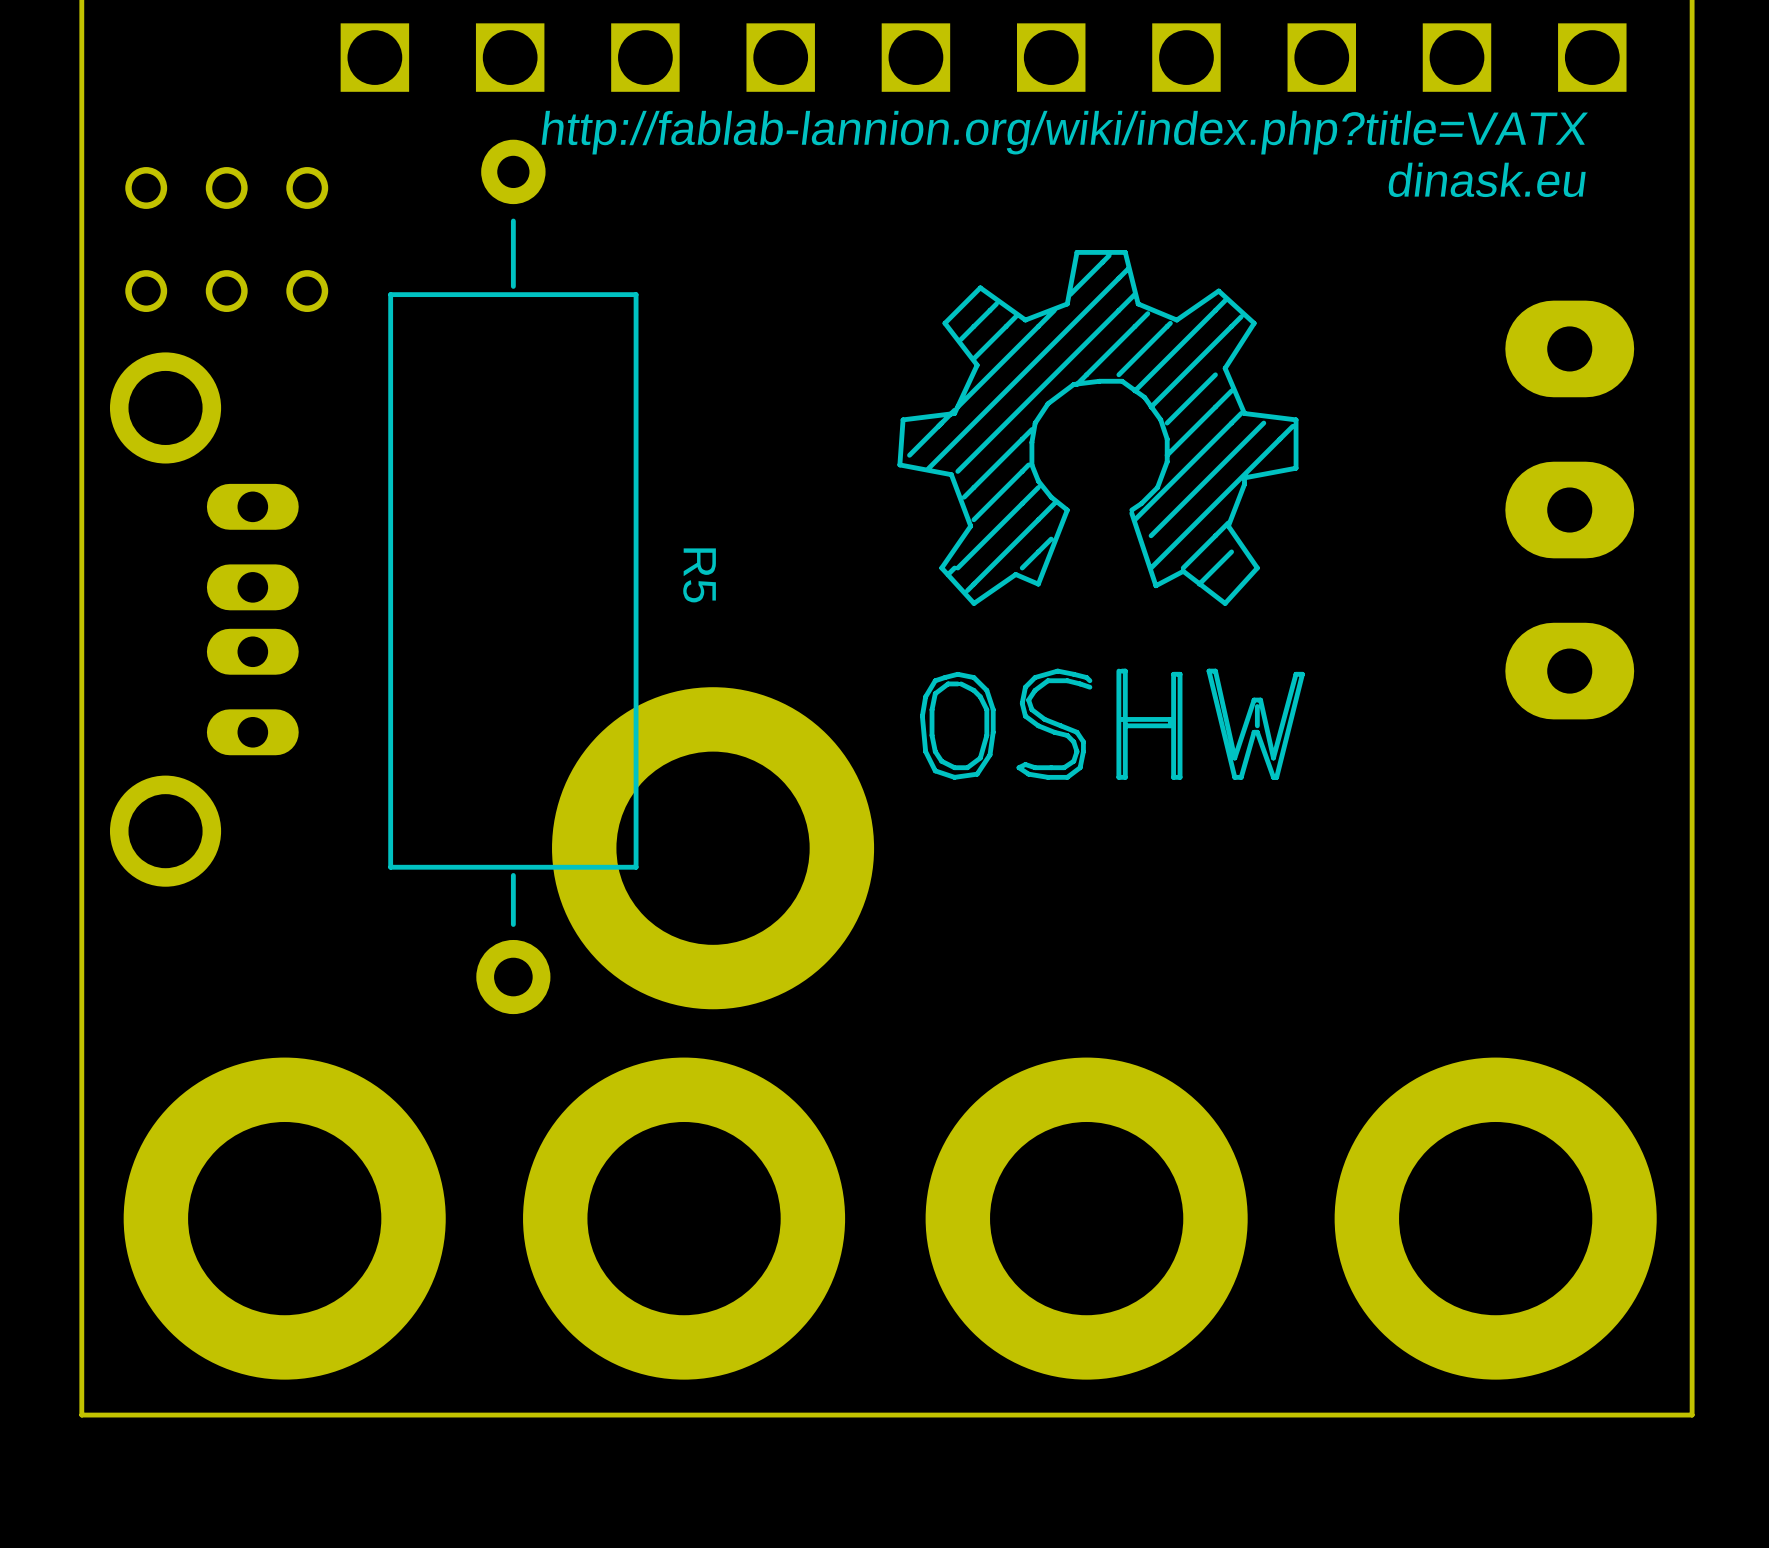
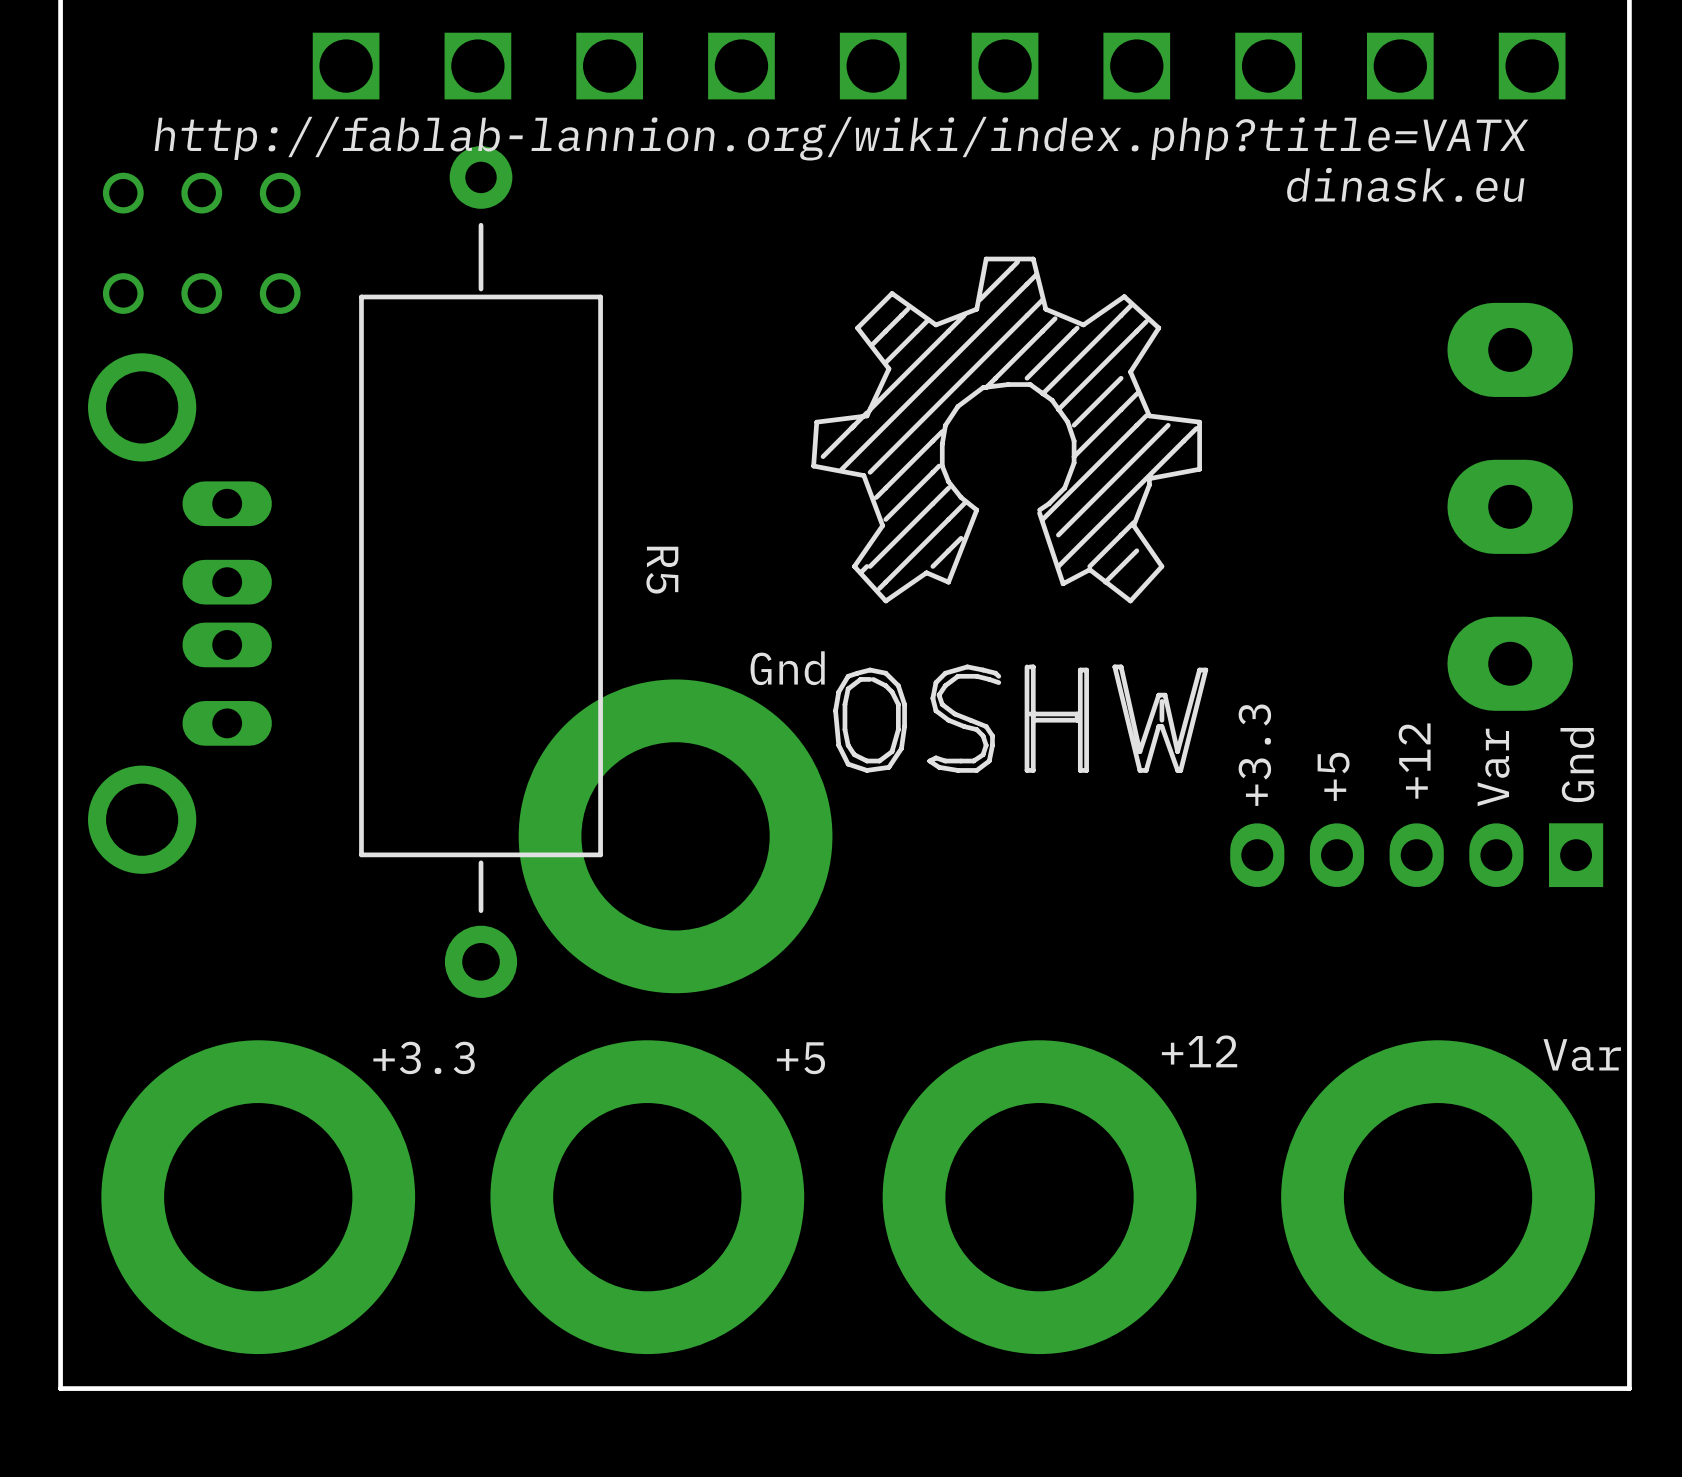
drawing position: (1101, 514) -> (1009, 514)
text: none -> Gnd (787, 668)
text: none -> +3.3 (1254, 755)
text: none -> +12 (1414, 761)
text: none -> Gnd (1577, 765)
text: none -> Var (1493, 767)
text: none -> +5 (1333, 776)
part: none -> (1416, 855)
text: none -> +12 (1199, 1051)
text: none -> Var (1582, 1055)
text: none -> +3.3 (424, 1057)
text: none -> +5 (800, 1058)

